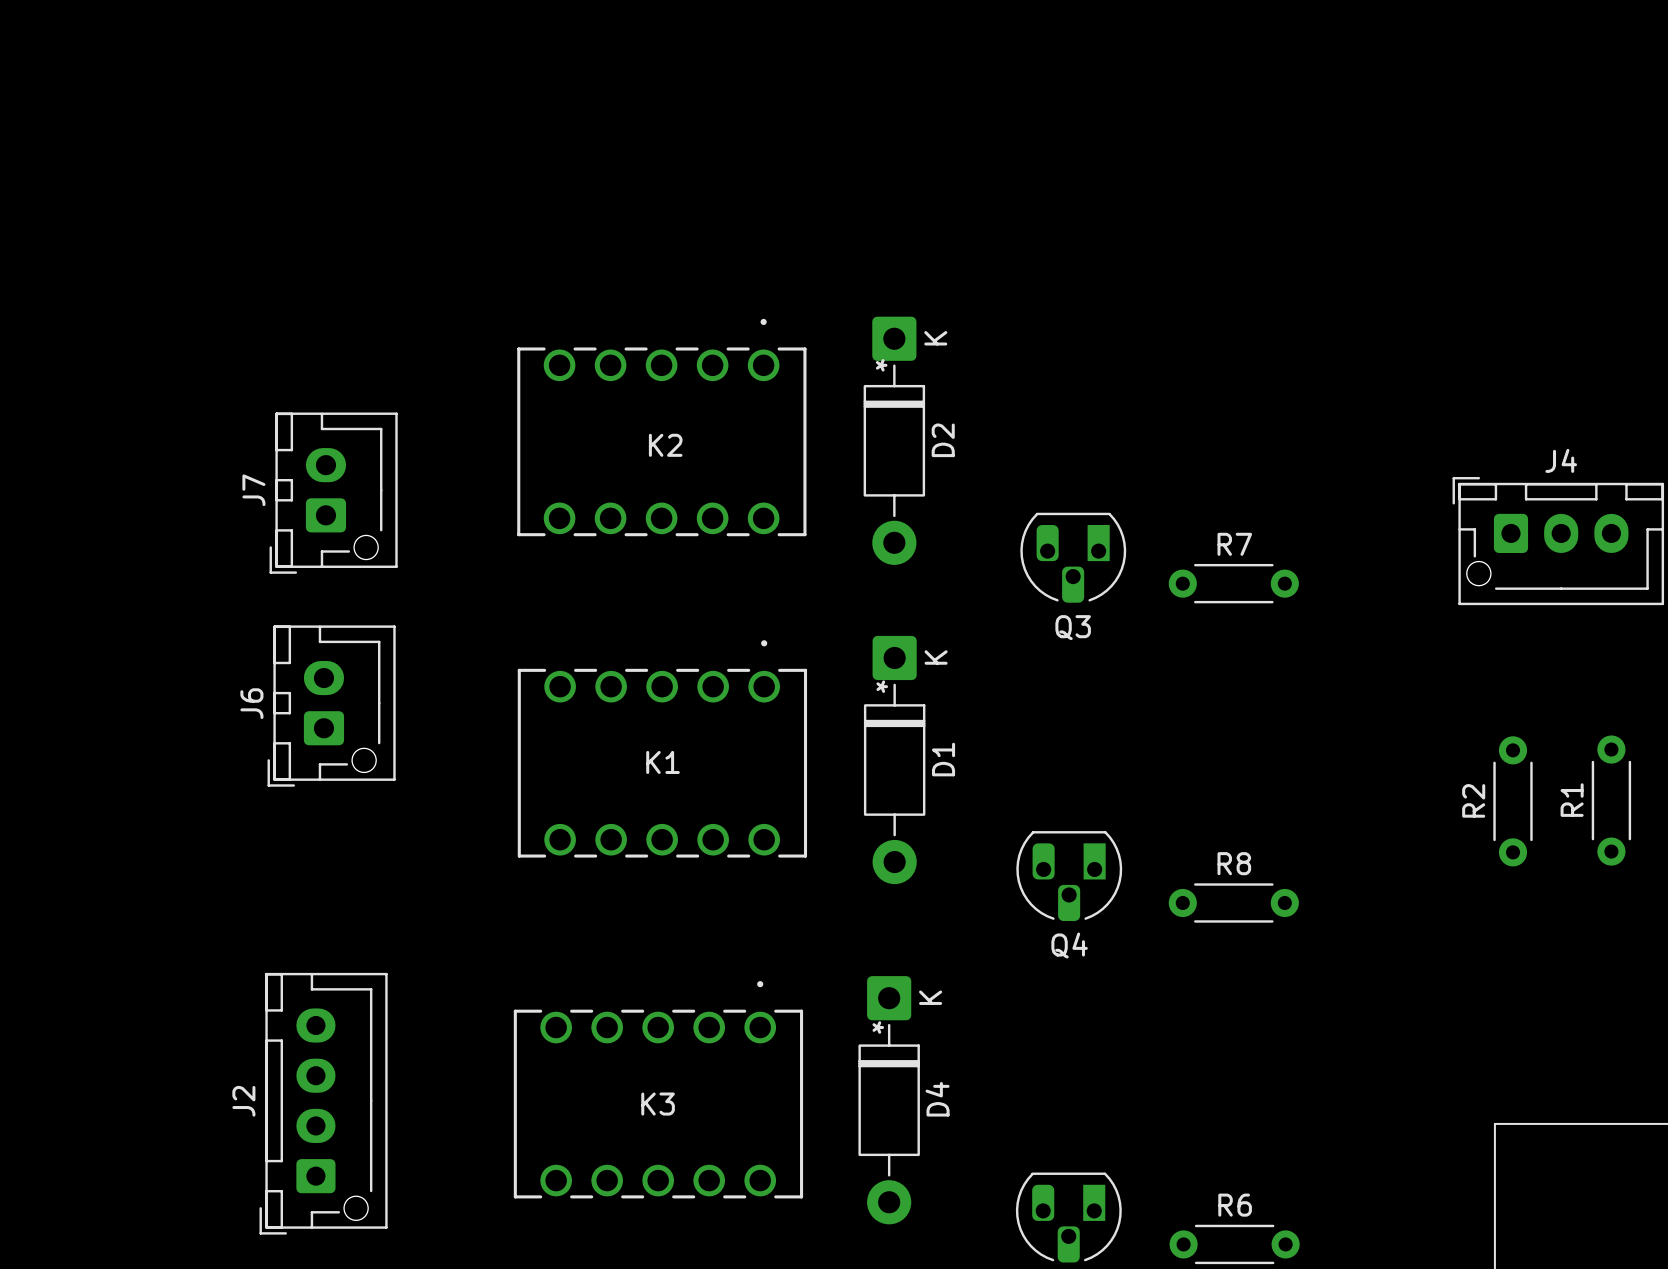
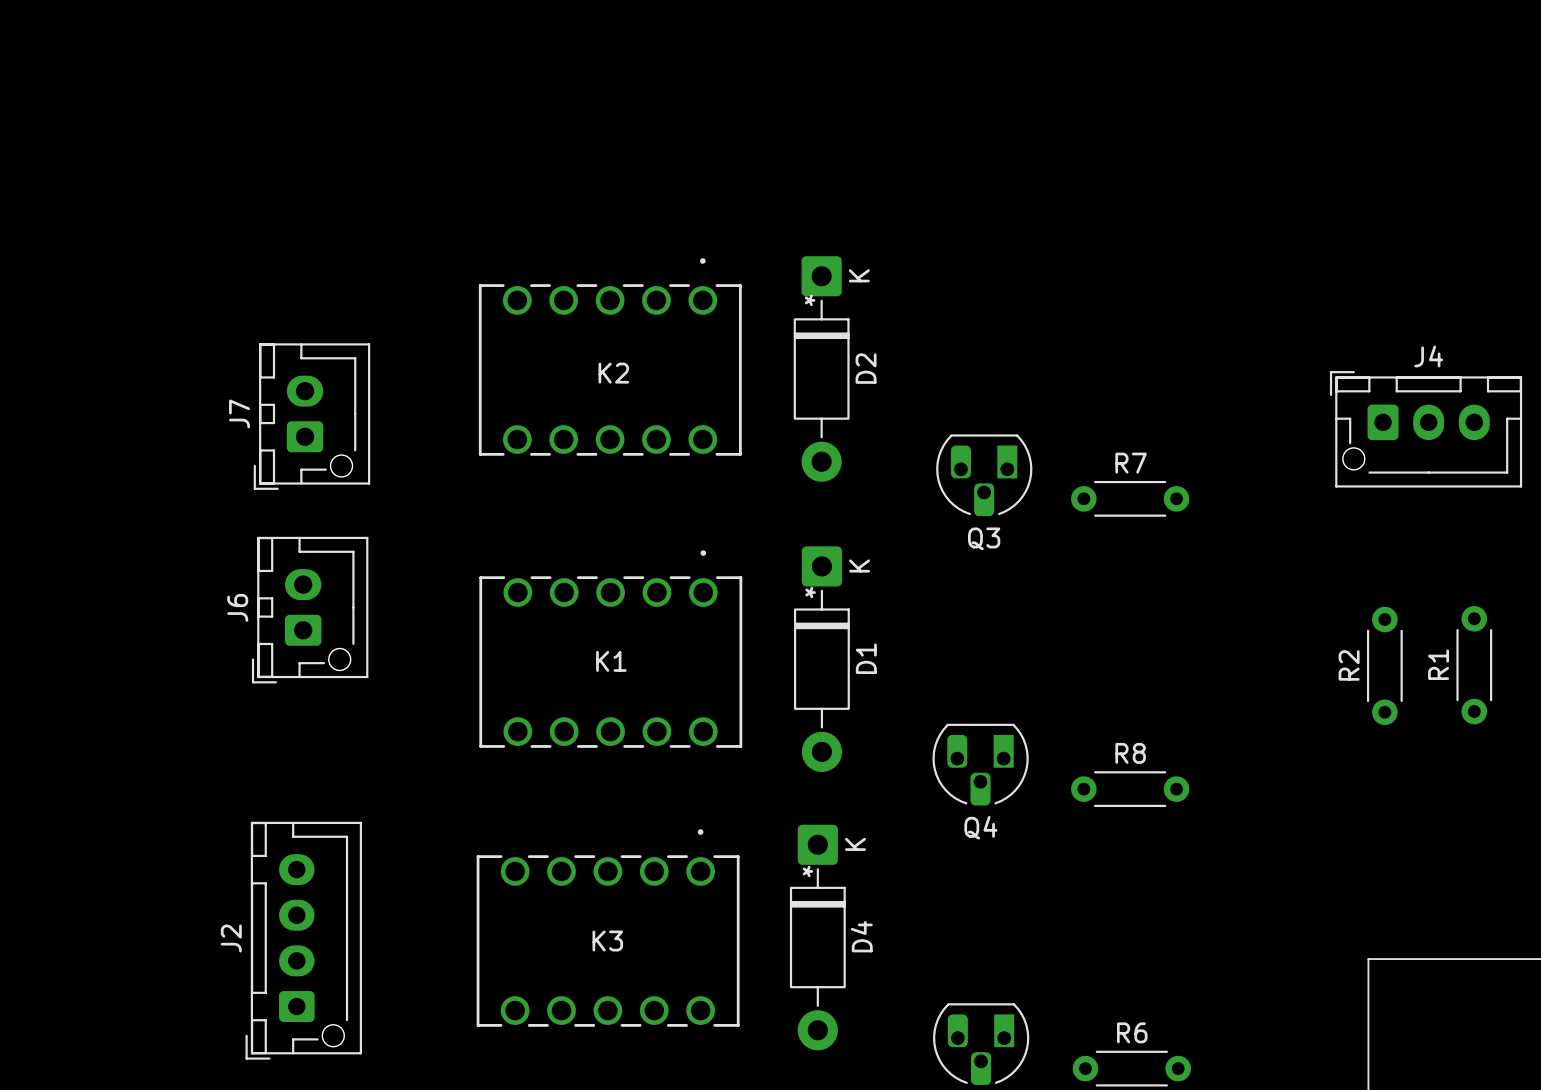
K2 position: (661, 427) -> (610, 356)
D2 position: (894, 440) -> (821, 369)
J7 position: (333, 493) -> (311, 416)
Q3 position: (1073, 557) -> (984, 475)
R7 position: (1233, 583) -> (1130, 498)
J6 position: (331, 706) -> (310, 610)
K1 position: (662, 748) -> (610, 649)
D1 position: (894, 760) -> (821, 659)
Q4 position: (1069, 876) -> (980, 764)
R8 position: (1233, 902) -> (1130, 789)

